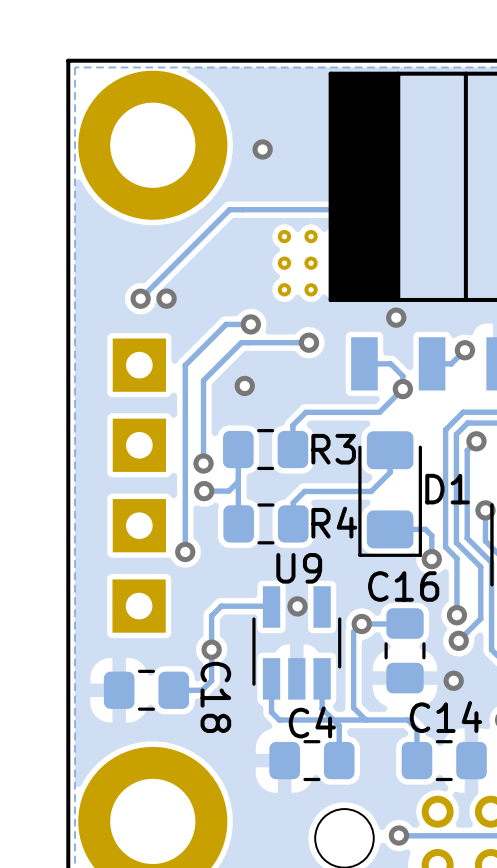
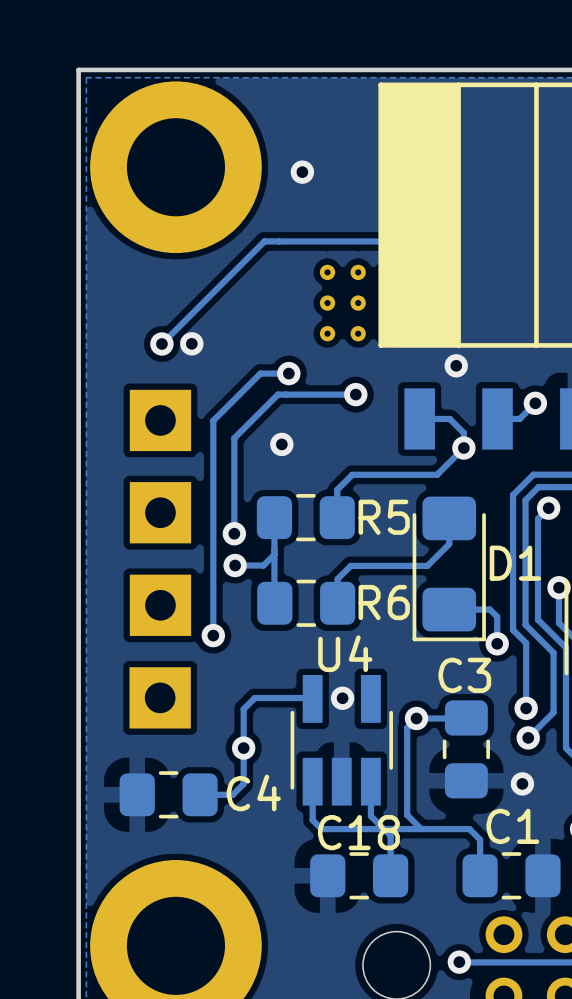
R3 name: R3 (333, 449) -> R5 (384, 517)
R4 name: R4 (334, 522) -> R6 (384, 602)
U9 name: U9 (299, 568) -> U4 (345, 653)
C16 name: C16 (403, 586) -> C3 (464, 675)
C18 name: C18 (215, 697) -> C4 (253, 792)
C14 name: C14 (445, 717) -> C1 (512, 826)
C4 name: C4 (312, 722) -> C18 (358, 832)

